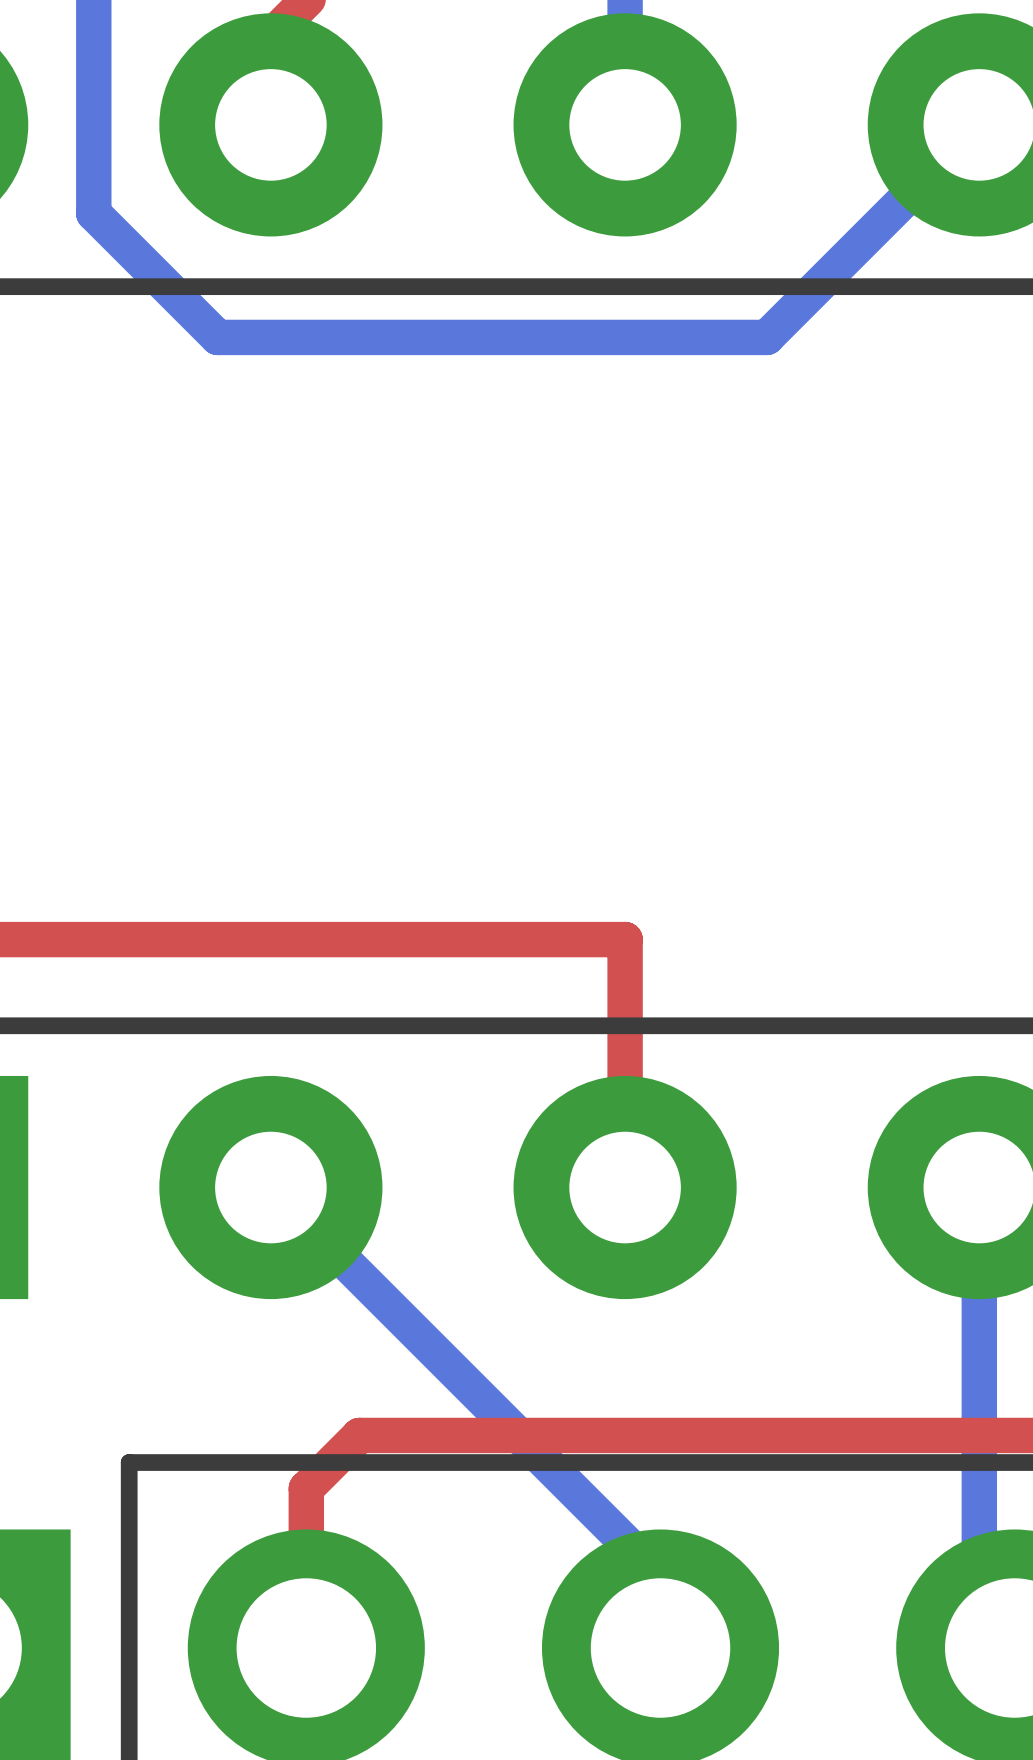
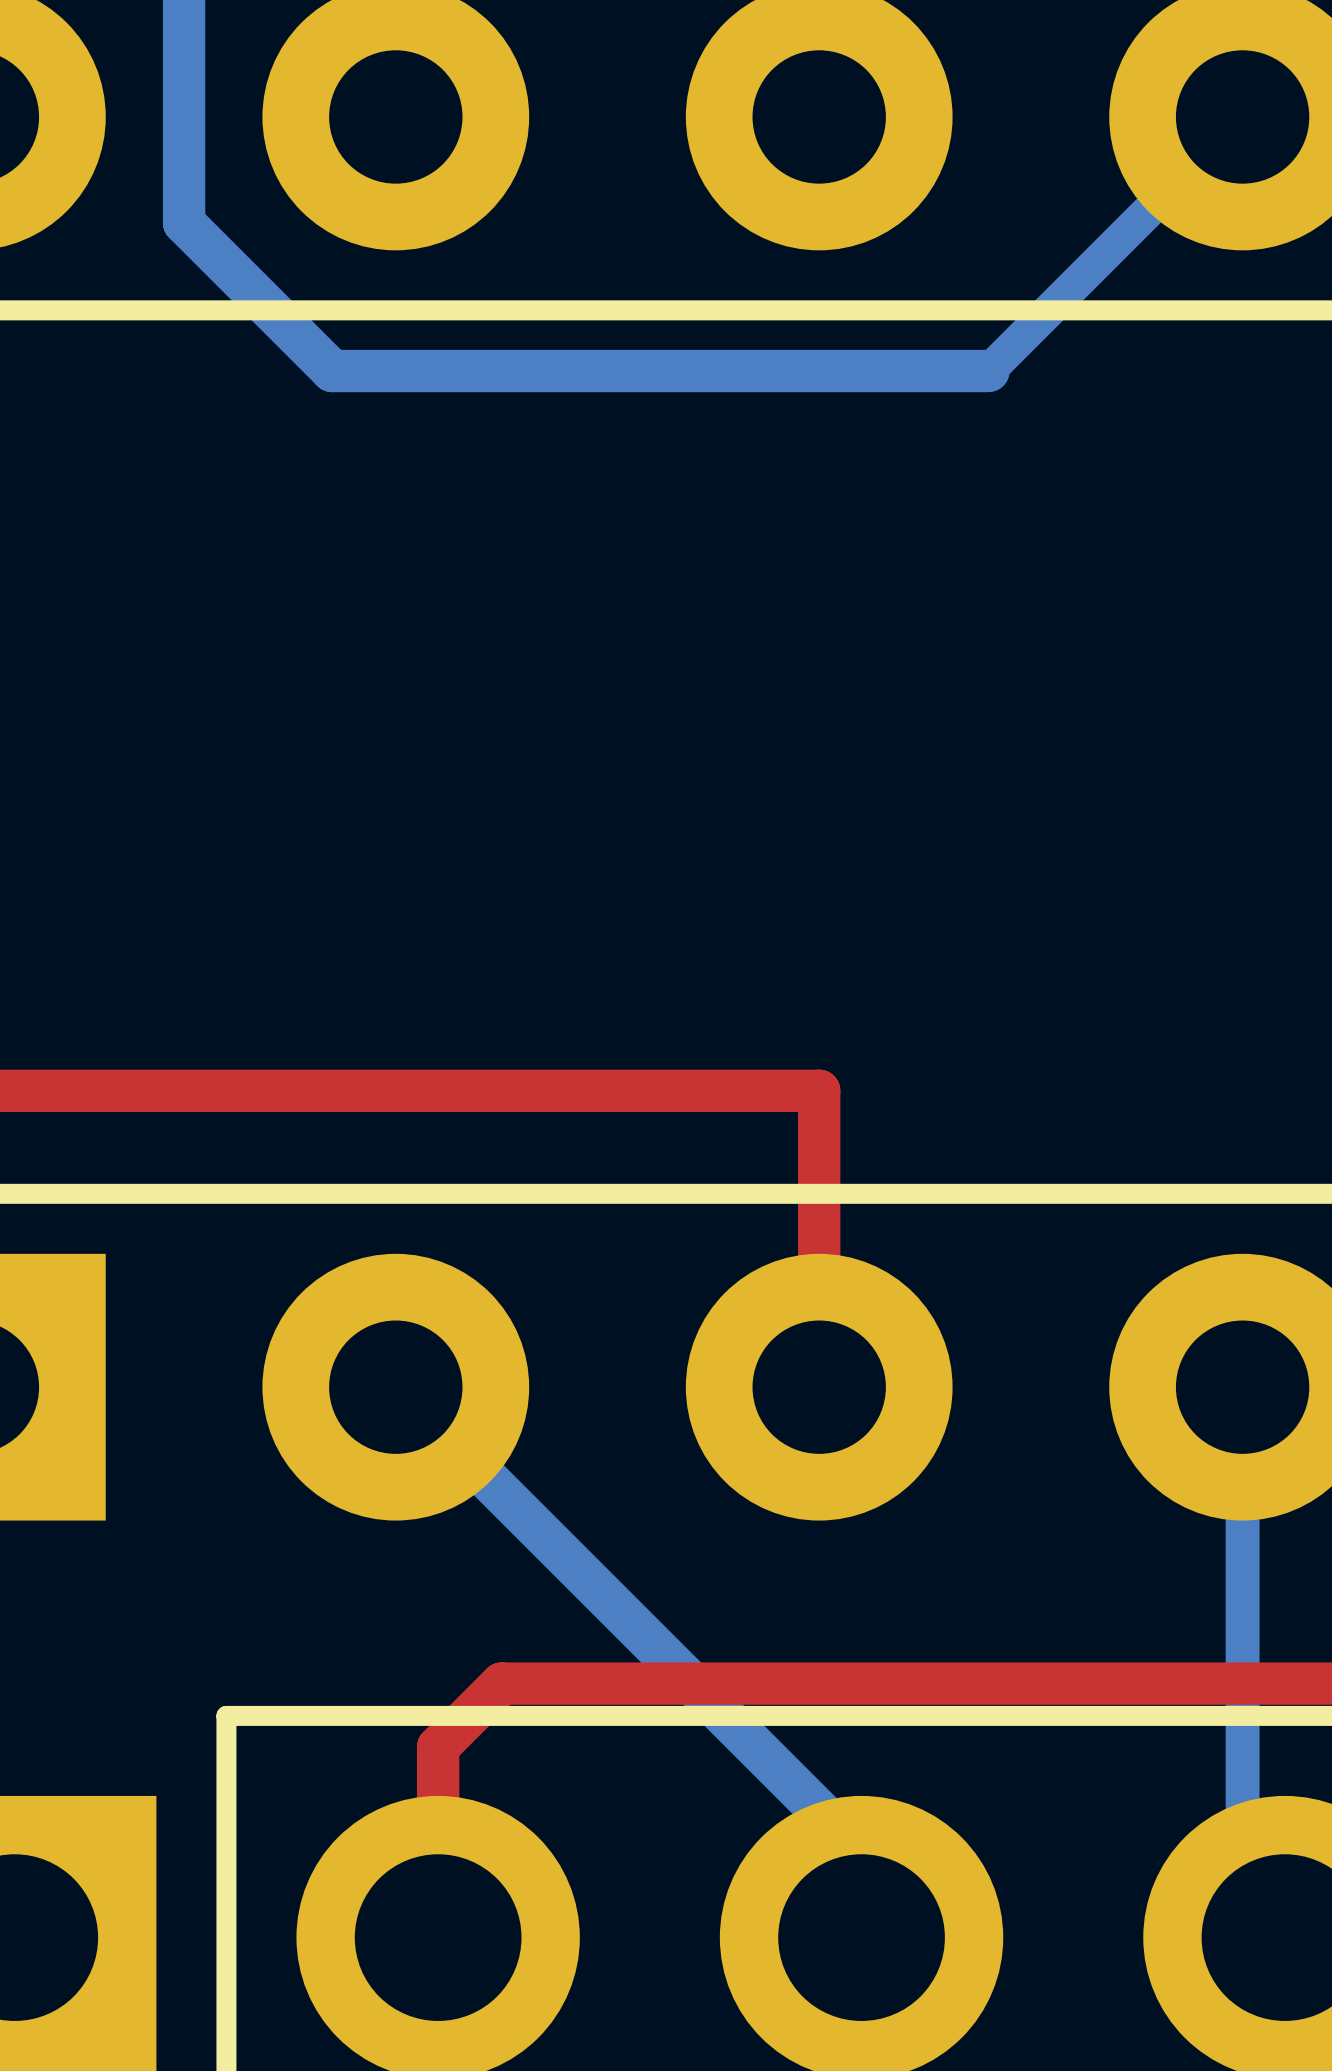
bottom track width: thick (979, 124) (766, 337) -> thin (1242, 116) (988, 371)
bottom track width: thick (979, 1187) (979, 1612) -> thin (1242, 1387) (1242, 1895)

